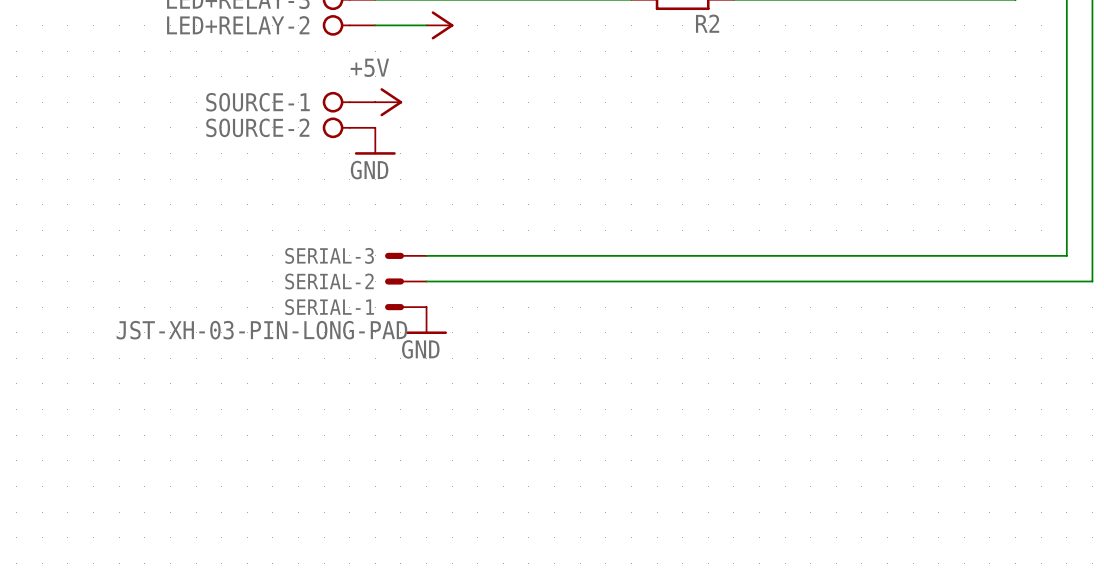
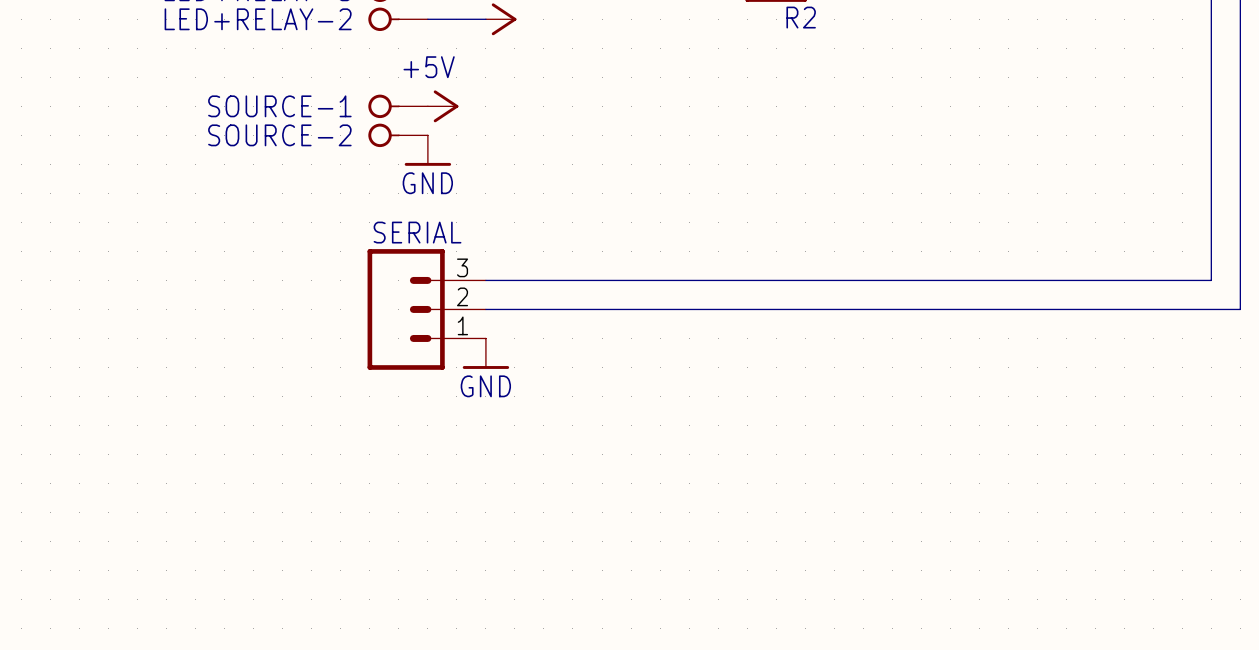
SERIAL-3: (405, 255) -> none
SERIAL: none -> (426, 309)
SERIAL-2: (405, 281) -> none
SERIAL-1: JST-XH-03-PIN-LONG-PAD (405, 307) -> none

